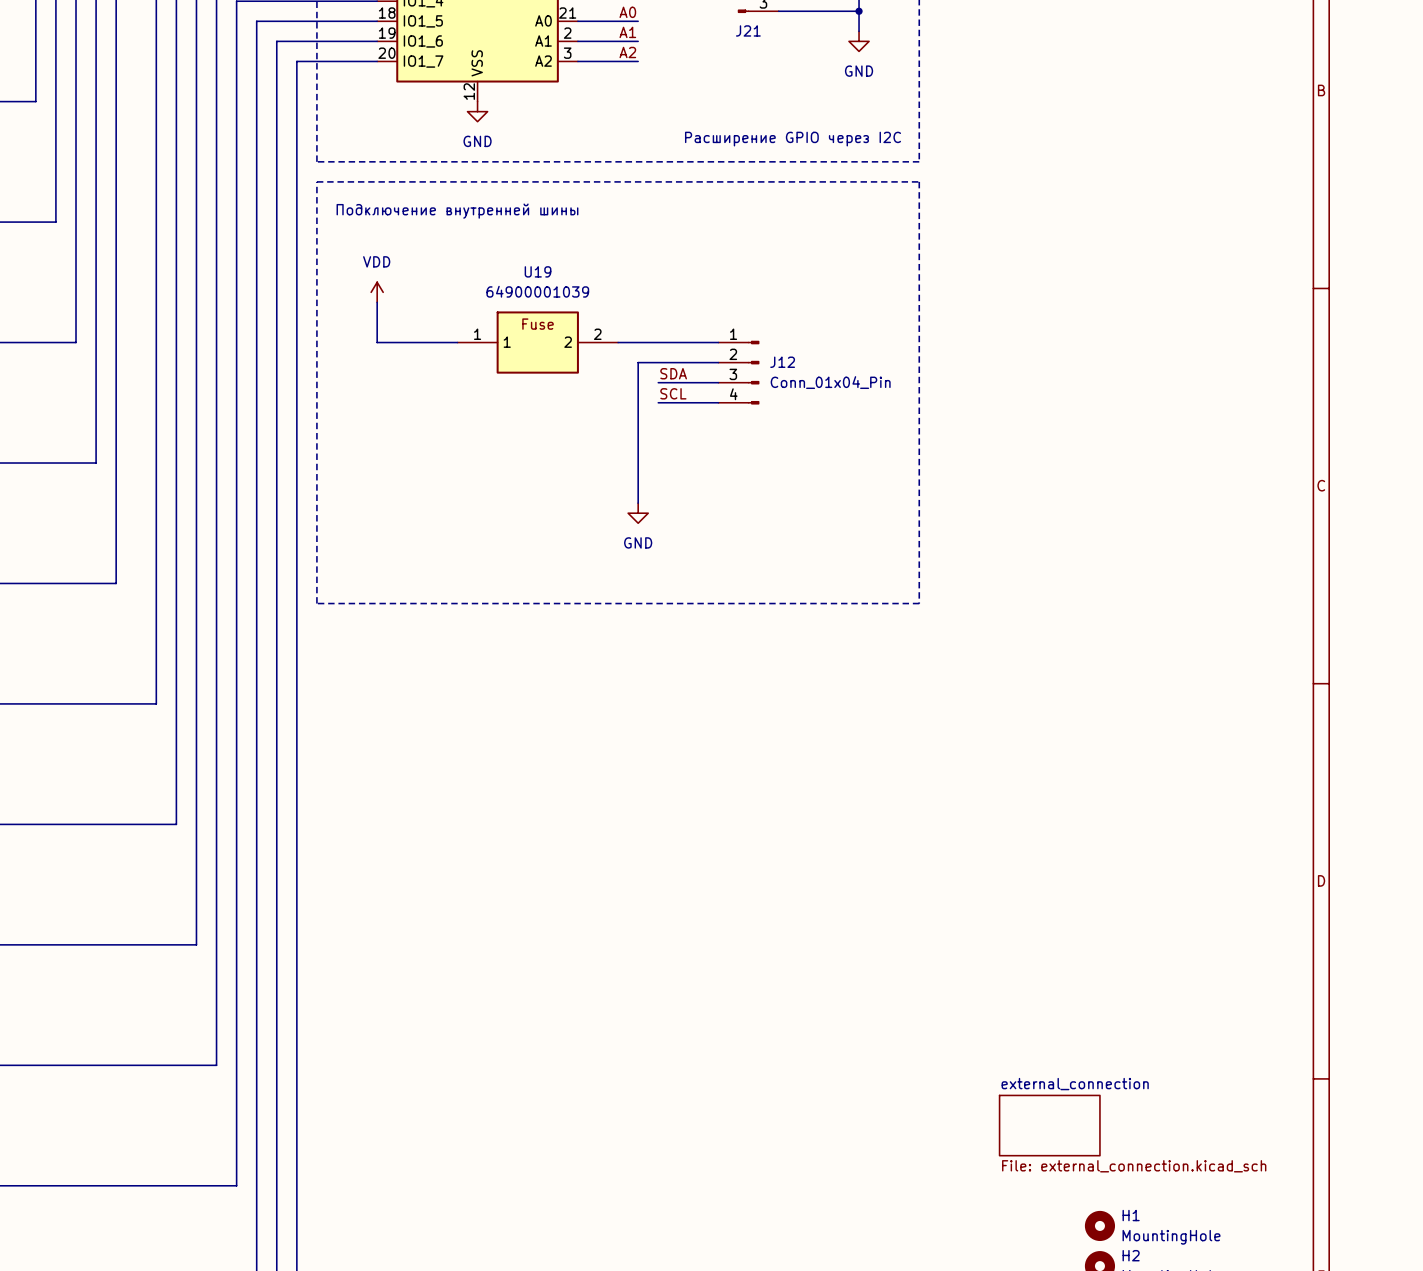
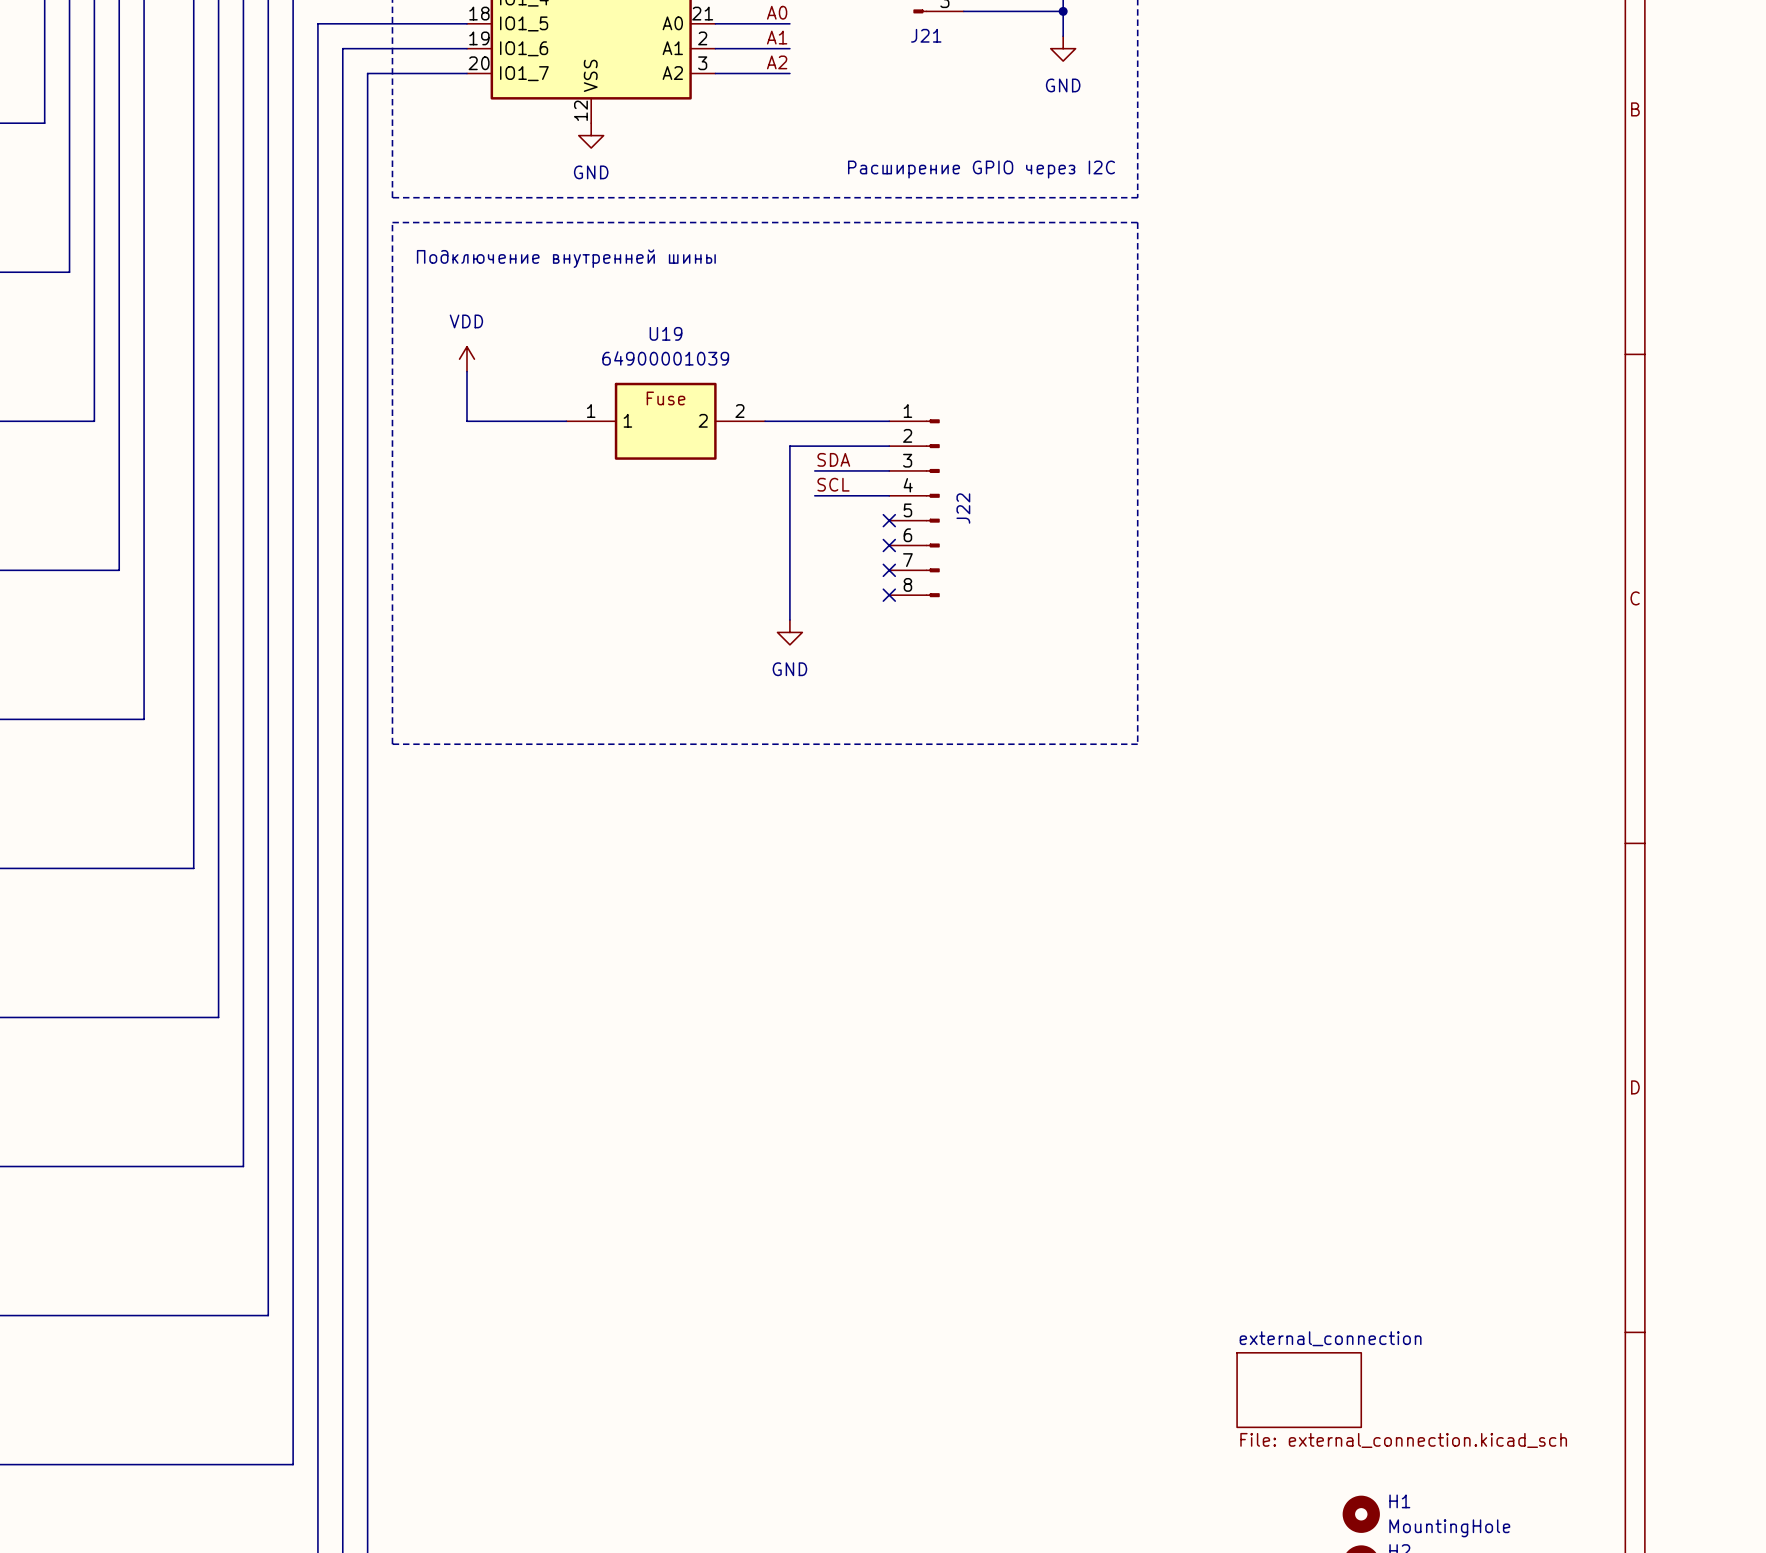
J12: Conn_01x04_Pin (738, 372) -> none
J22: none -> (914, 508)
no-connect mark: none -> (889, 520)
no-connect mark: none -> (889, 545)
no-connect mark: none -> (889, 570)
no-connect mark: none -> (889, 595)

